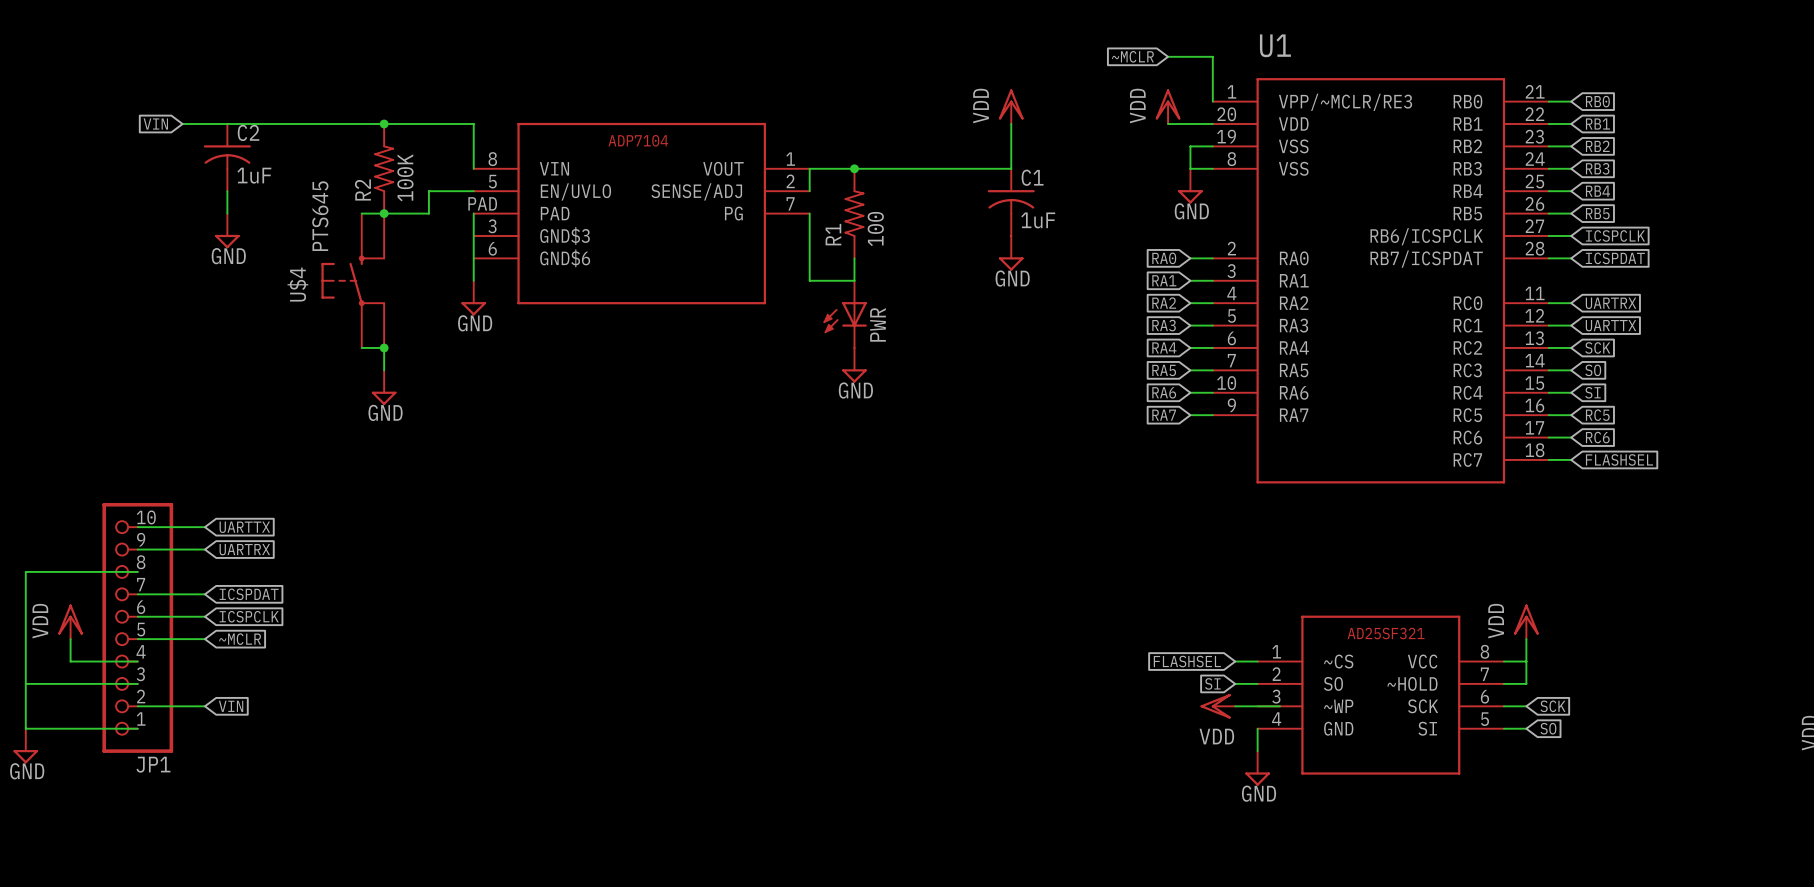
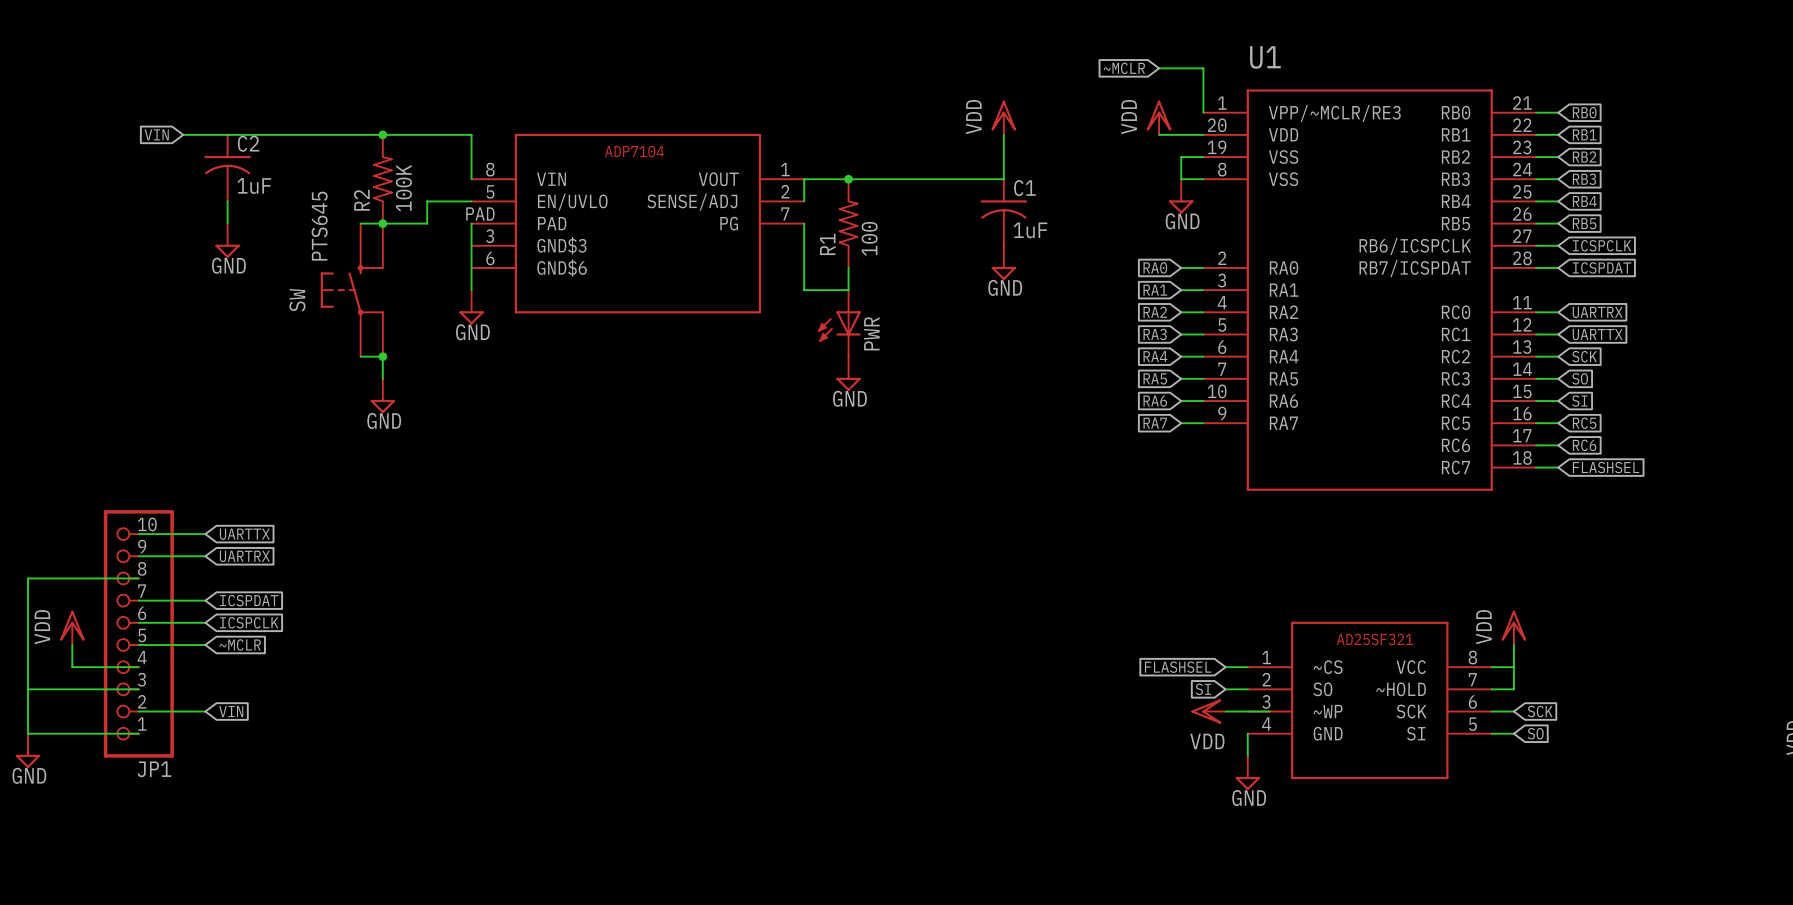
U$4 name: U$4 (297, 284) -> SW (297, 300)

